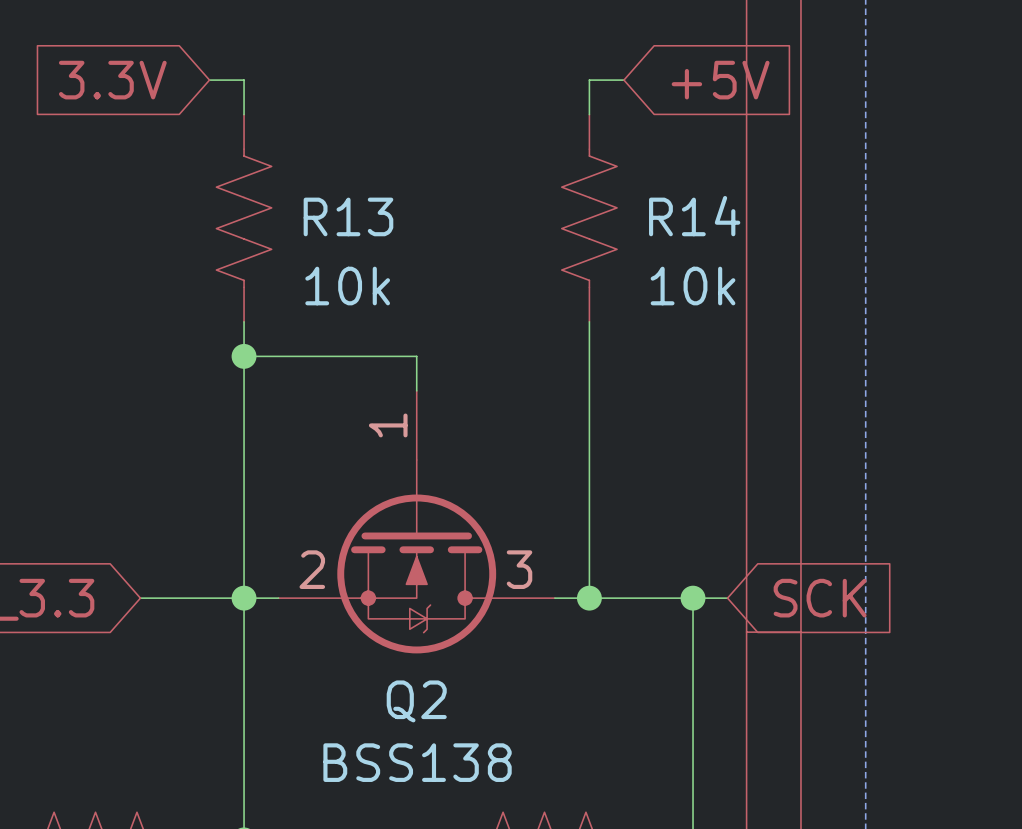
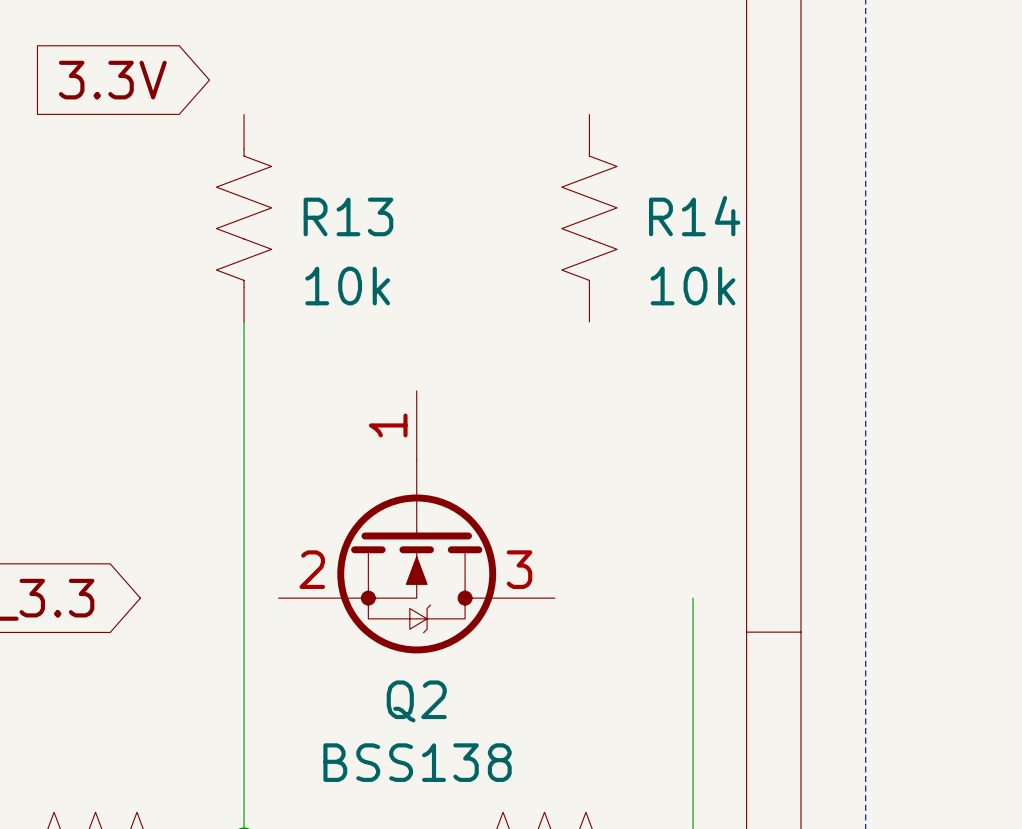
wire: (209, 80) (244, 80) (244, 114) -> none
wire: (623, 80) (589, 80) (589, 114) -> none
global label: +5V (720, 80) -> none
wire: (589, 321) (589, 598) -> none
wire: (244, 356) (416, 356) (416, 390) -> none
junction: (244, 356) -> none
wire: (140, 598) (278, 598) -> none
junction: (244, 598) -> none
wire: (554, 598) (727, 598) -> none
junction: (589, 598) -> none
junction: (693, 598) -> none
global label: SCK (820, 598) -> none

